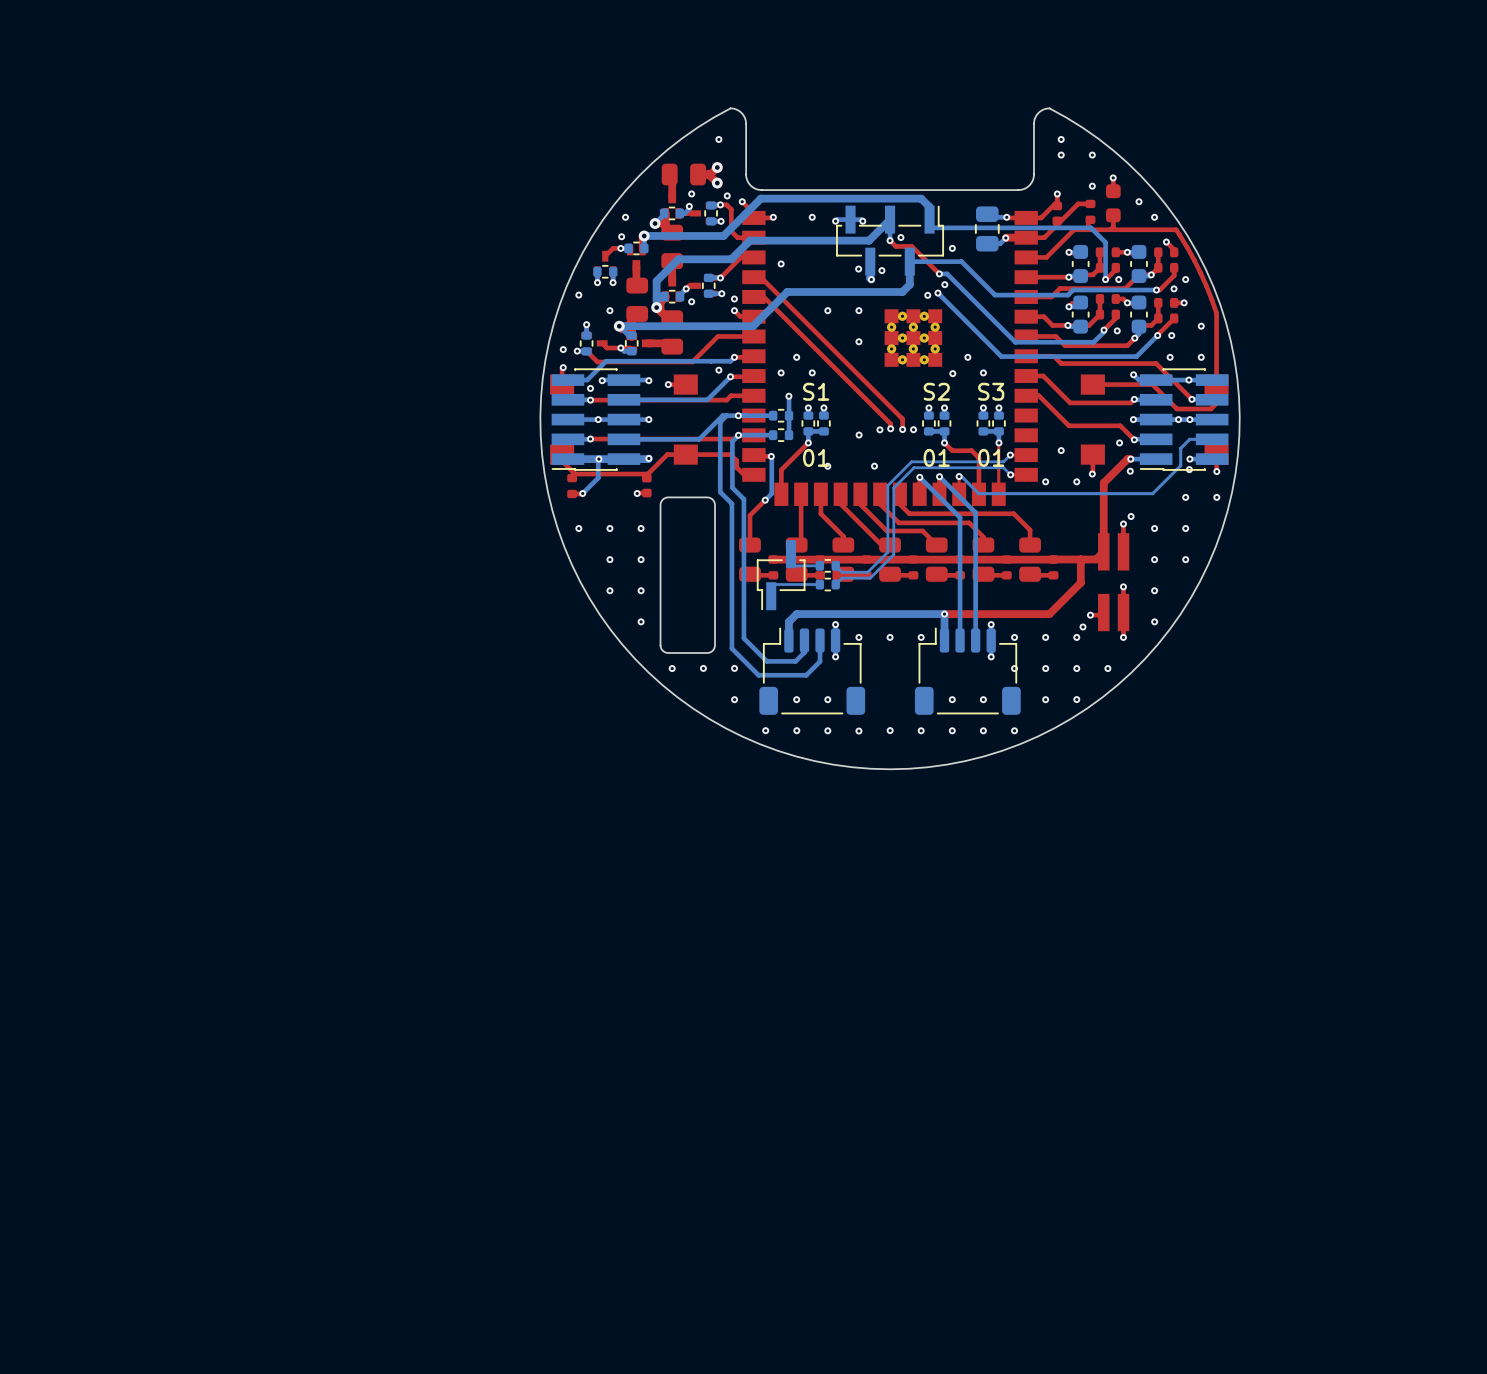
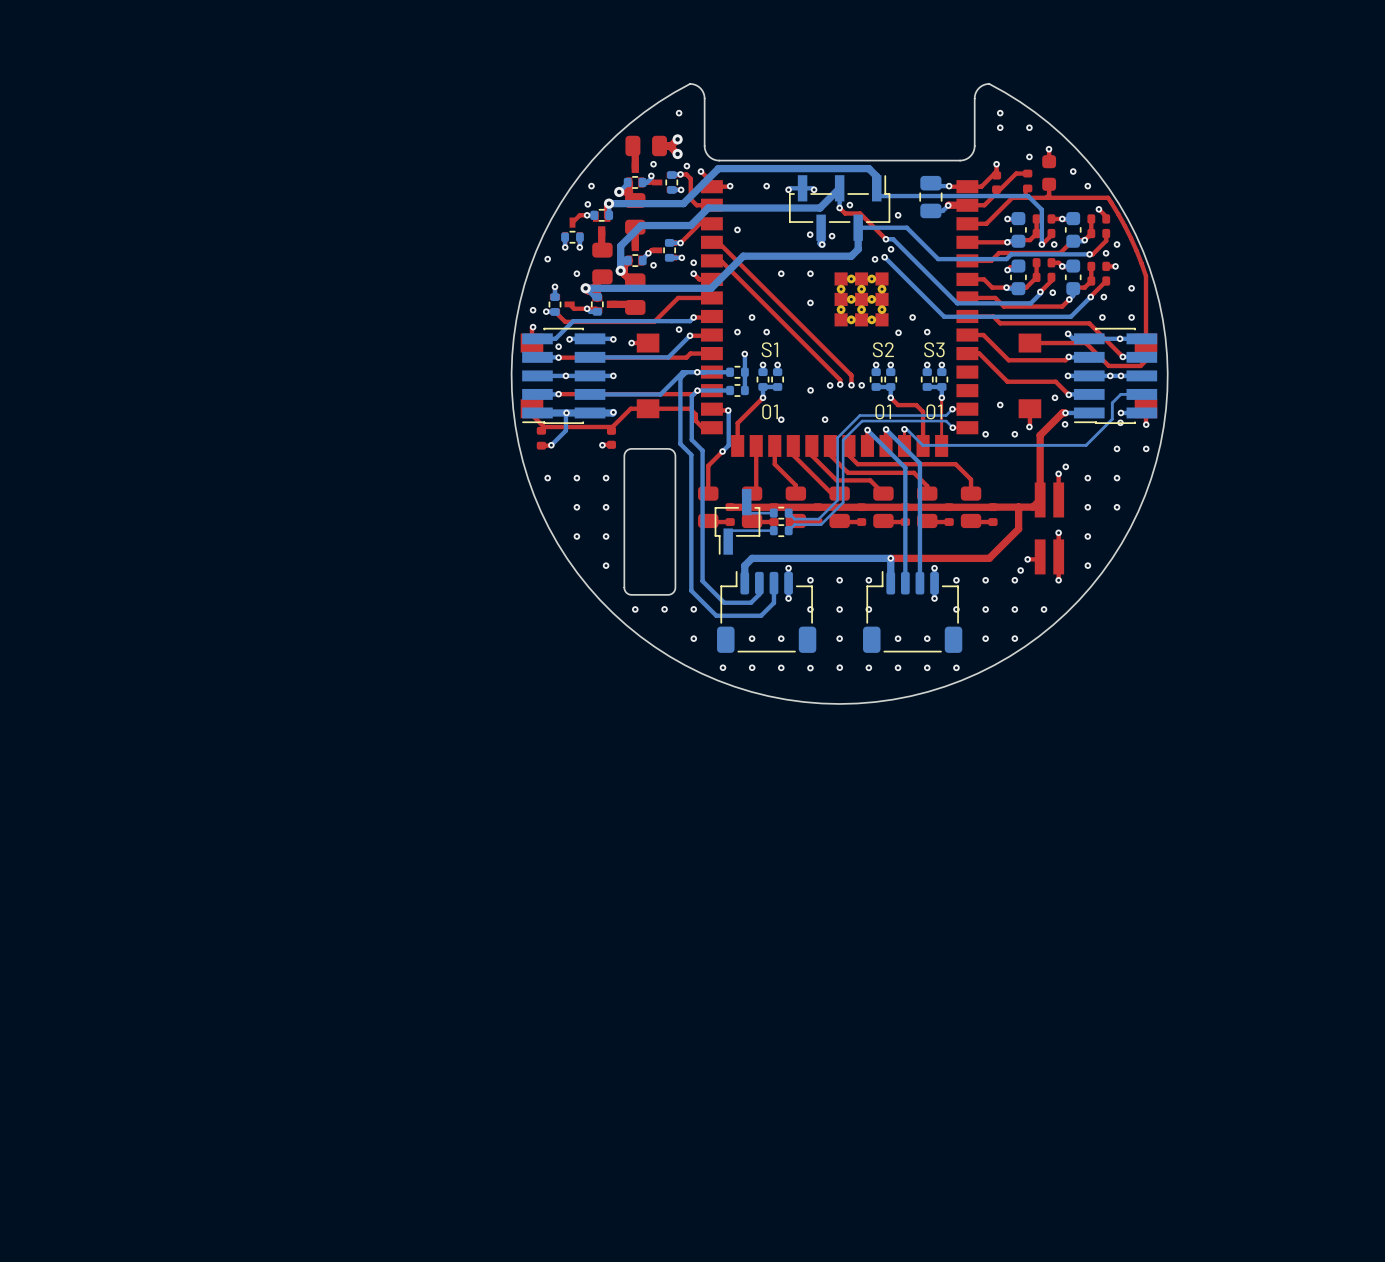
via: none -> (810, 609)
via: none -> (839, 609)
via: none -> (868, 609)
via: none -> (839, 638)

